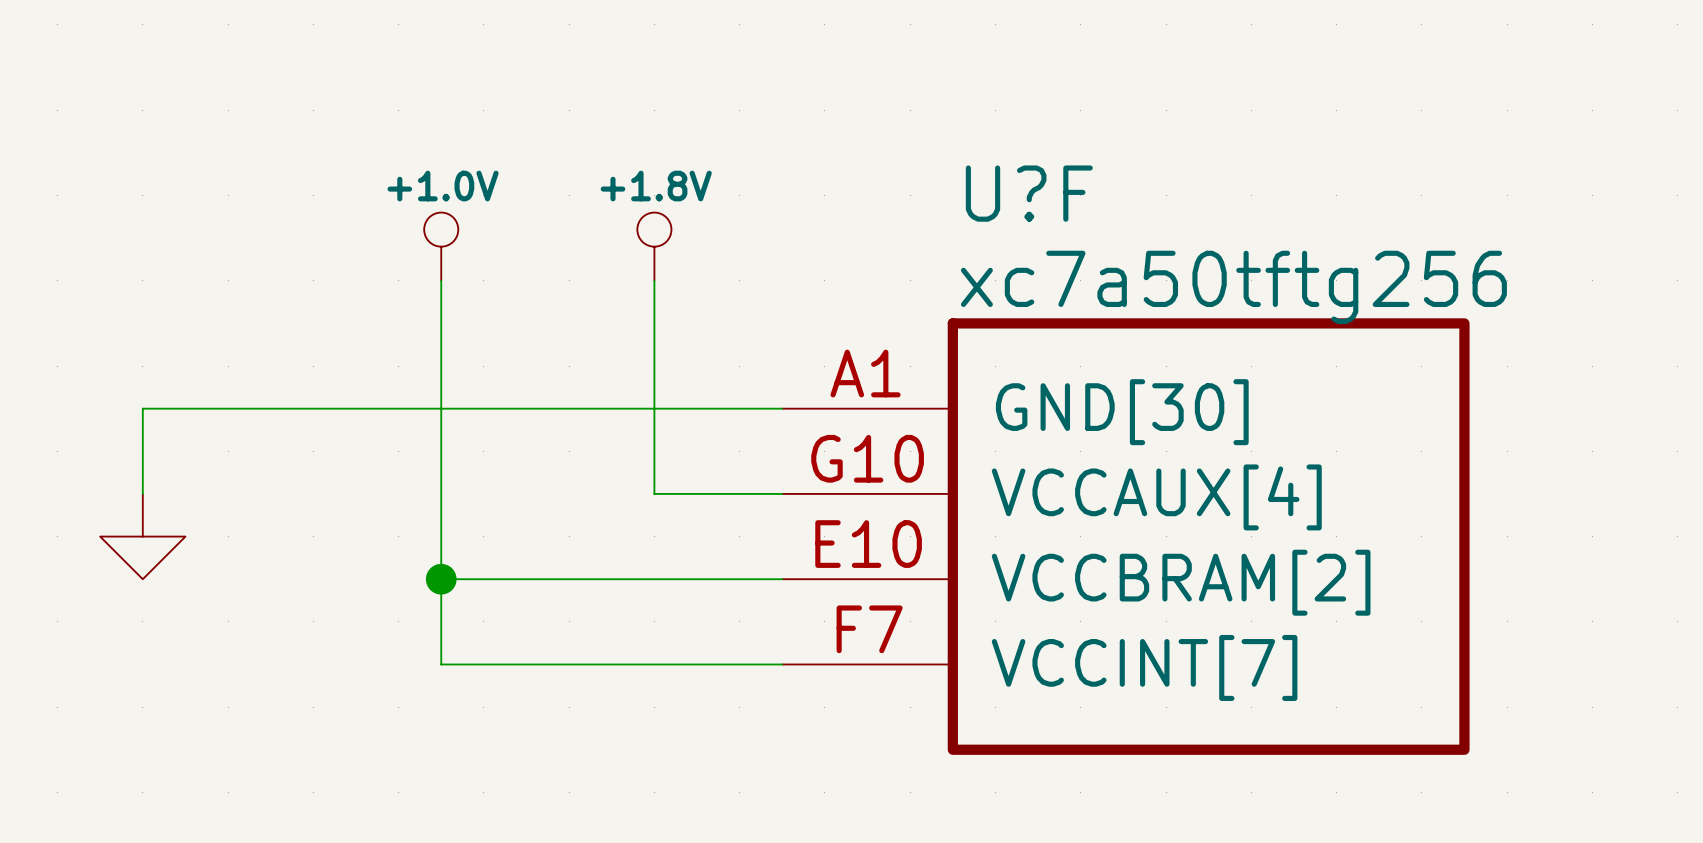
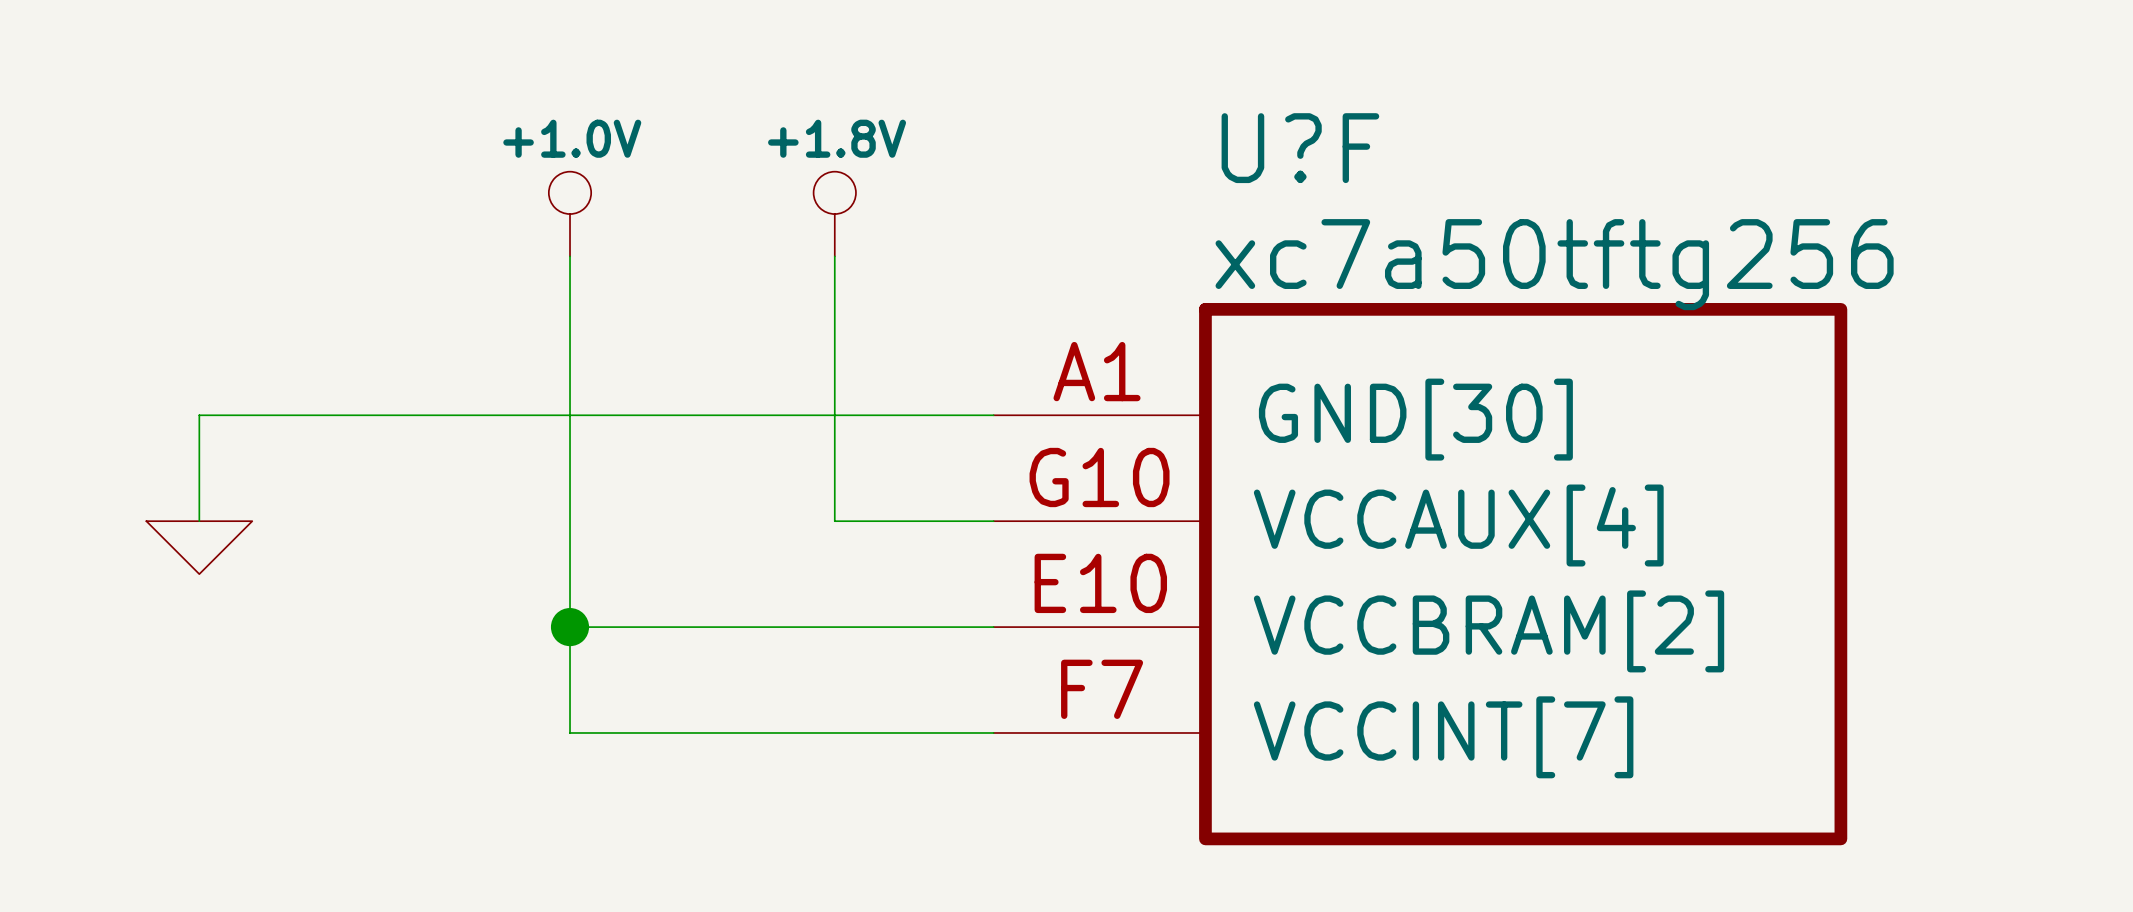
power symbol shape: [100, 493, 186, 580] -> [146, 521, 253, 575]

